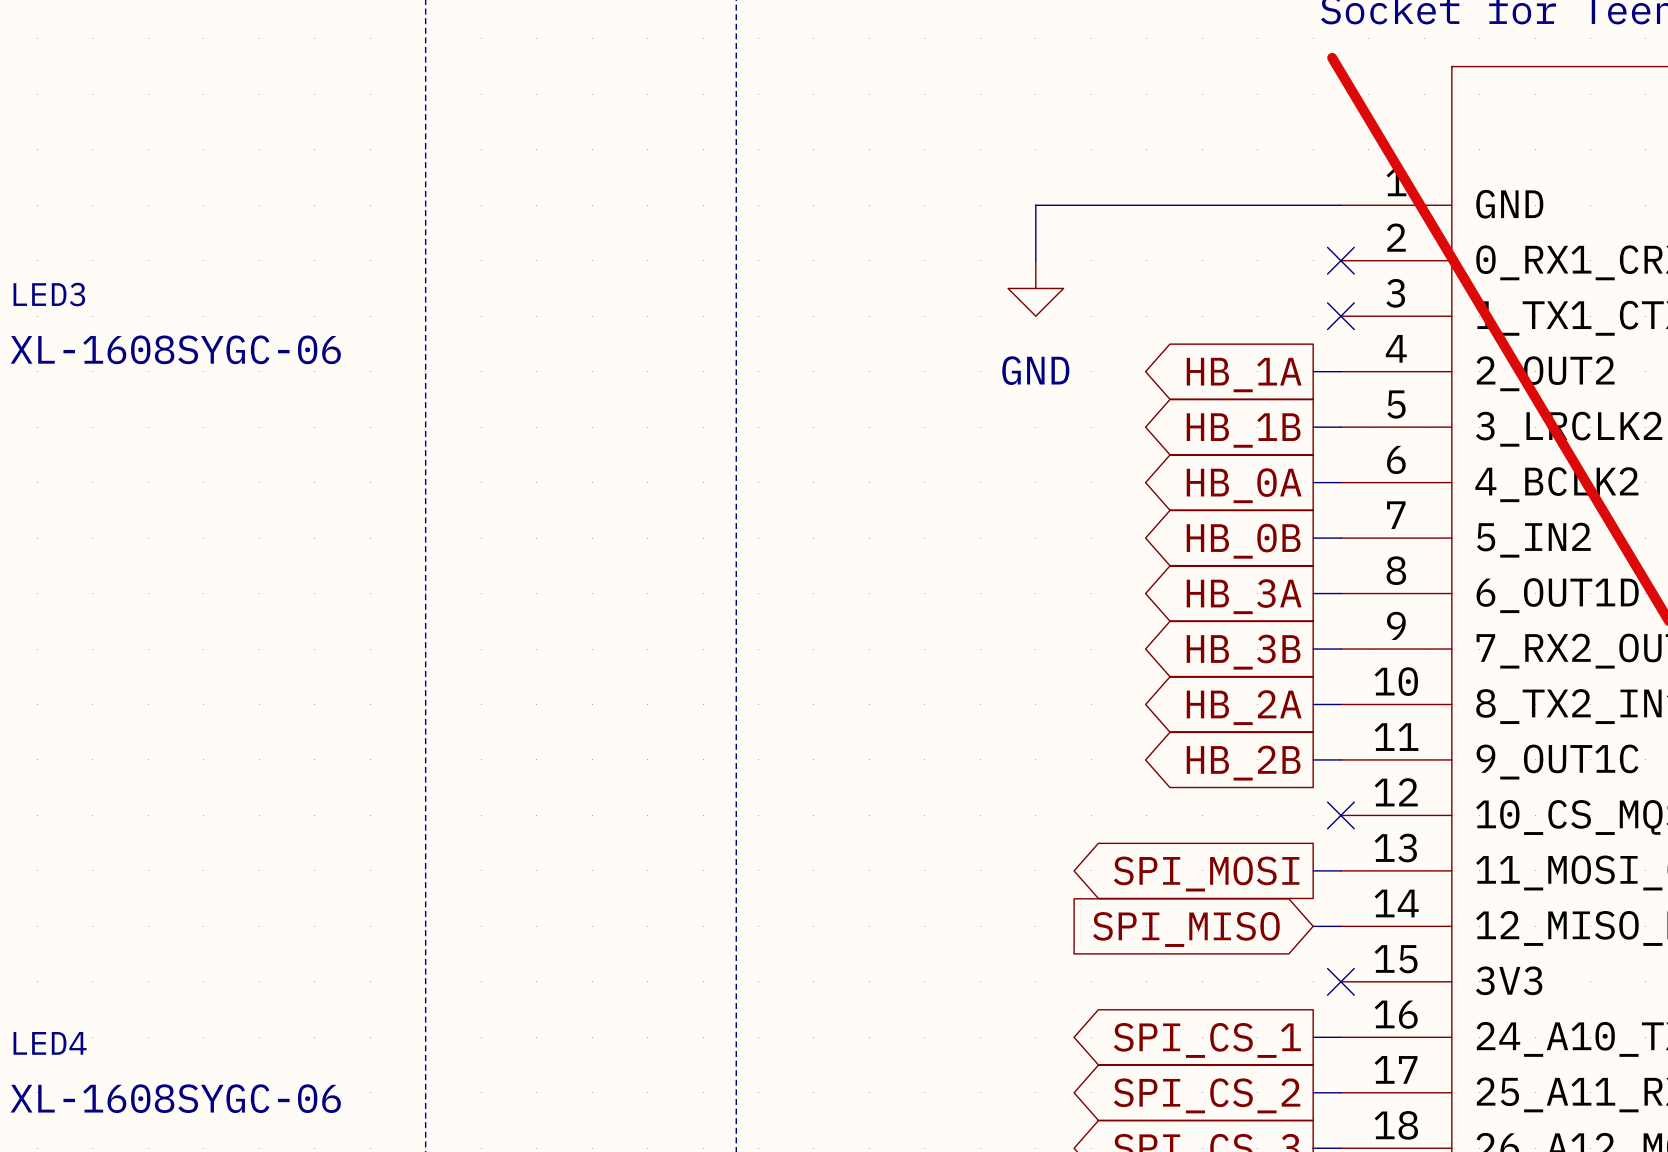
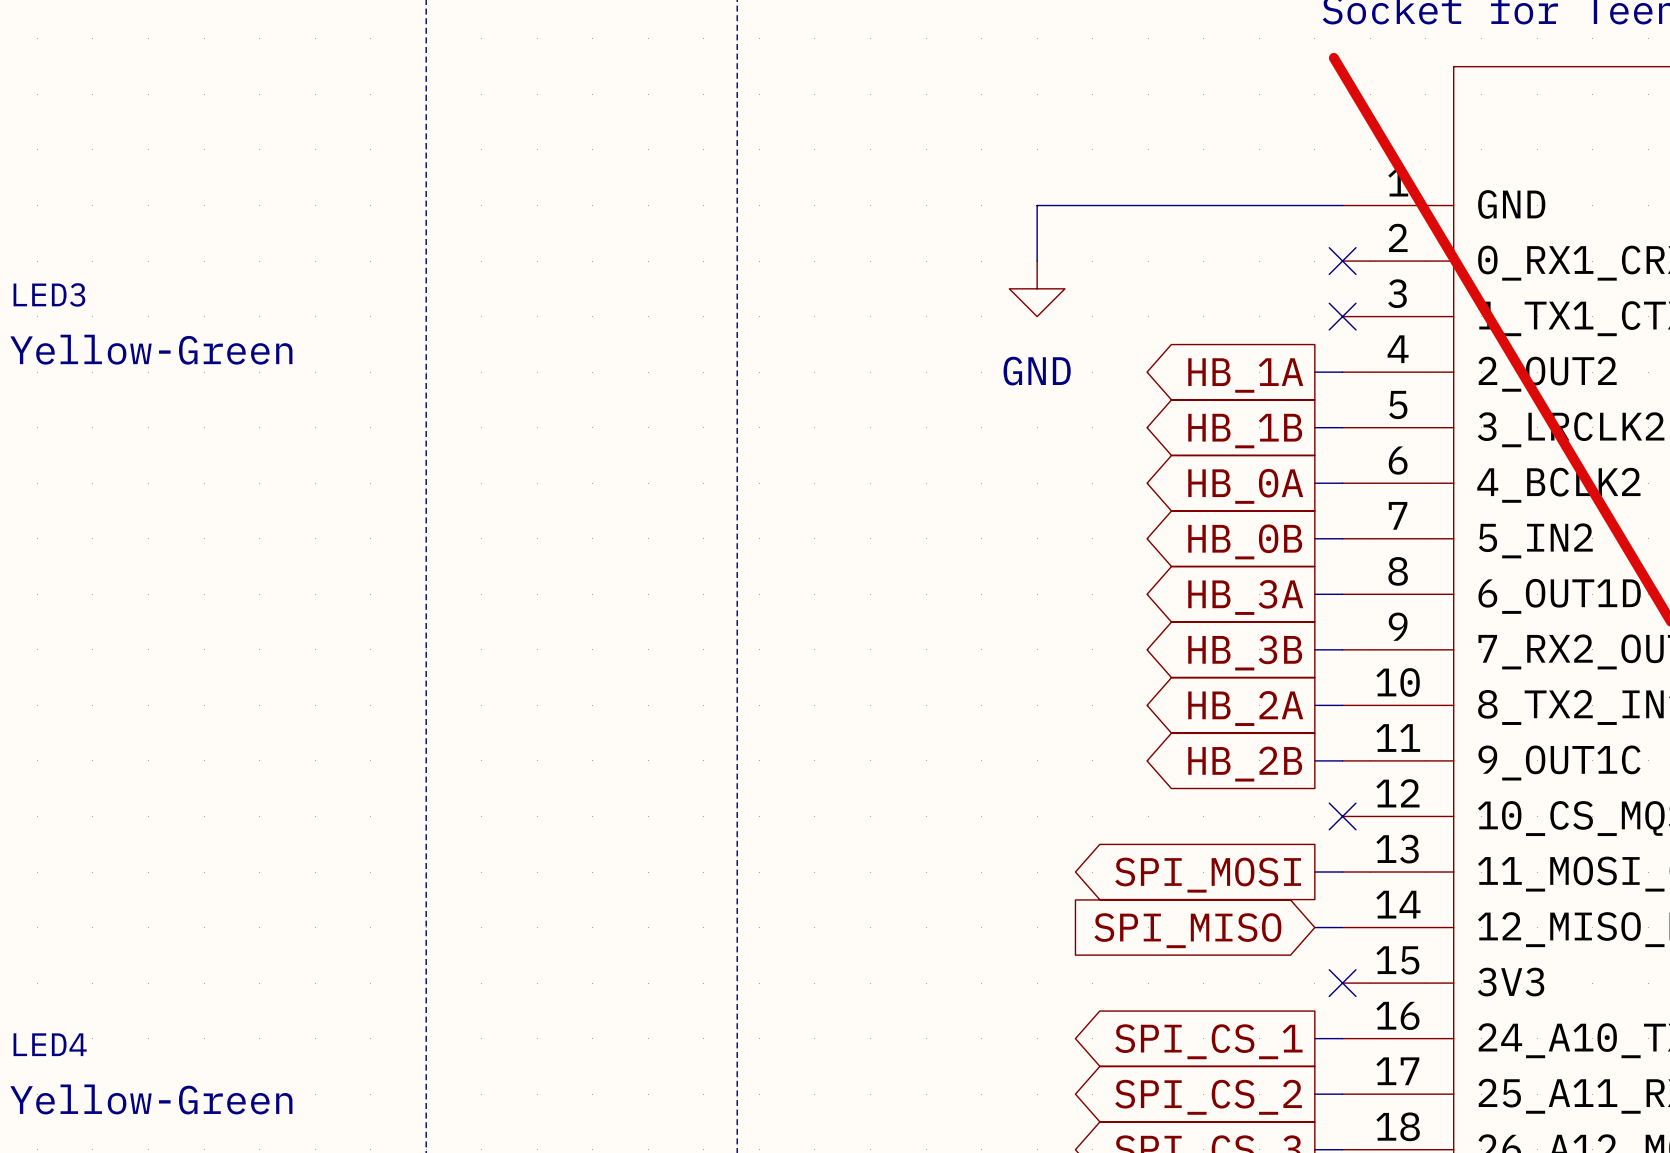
LED3 value: XL-1608SYGC-06 (175, 349) -> Yellow-Green (151, 349)
LED4 value: XL-1608SYGC-06 (175, 1098) -> Yellow-Green (151, 1099)

